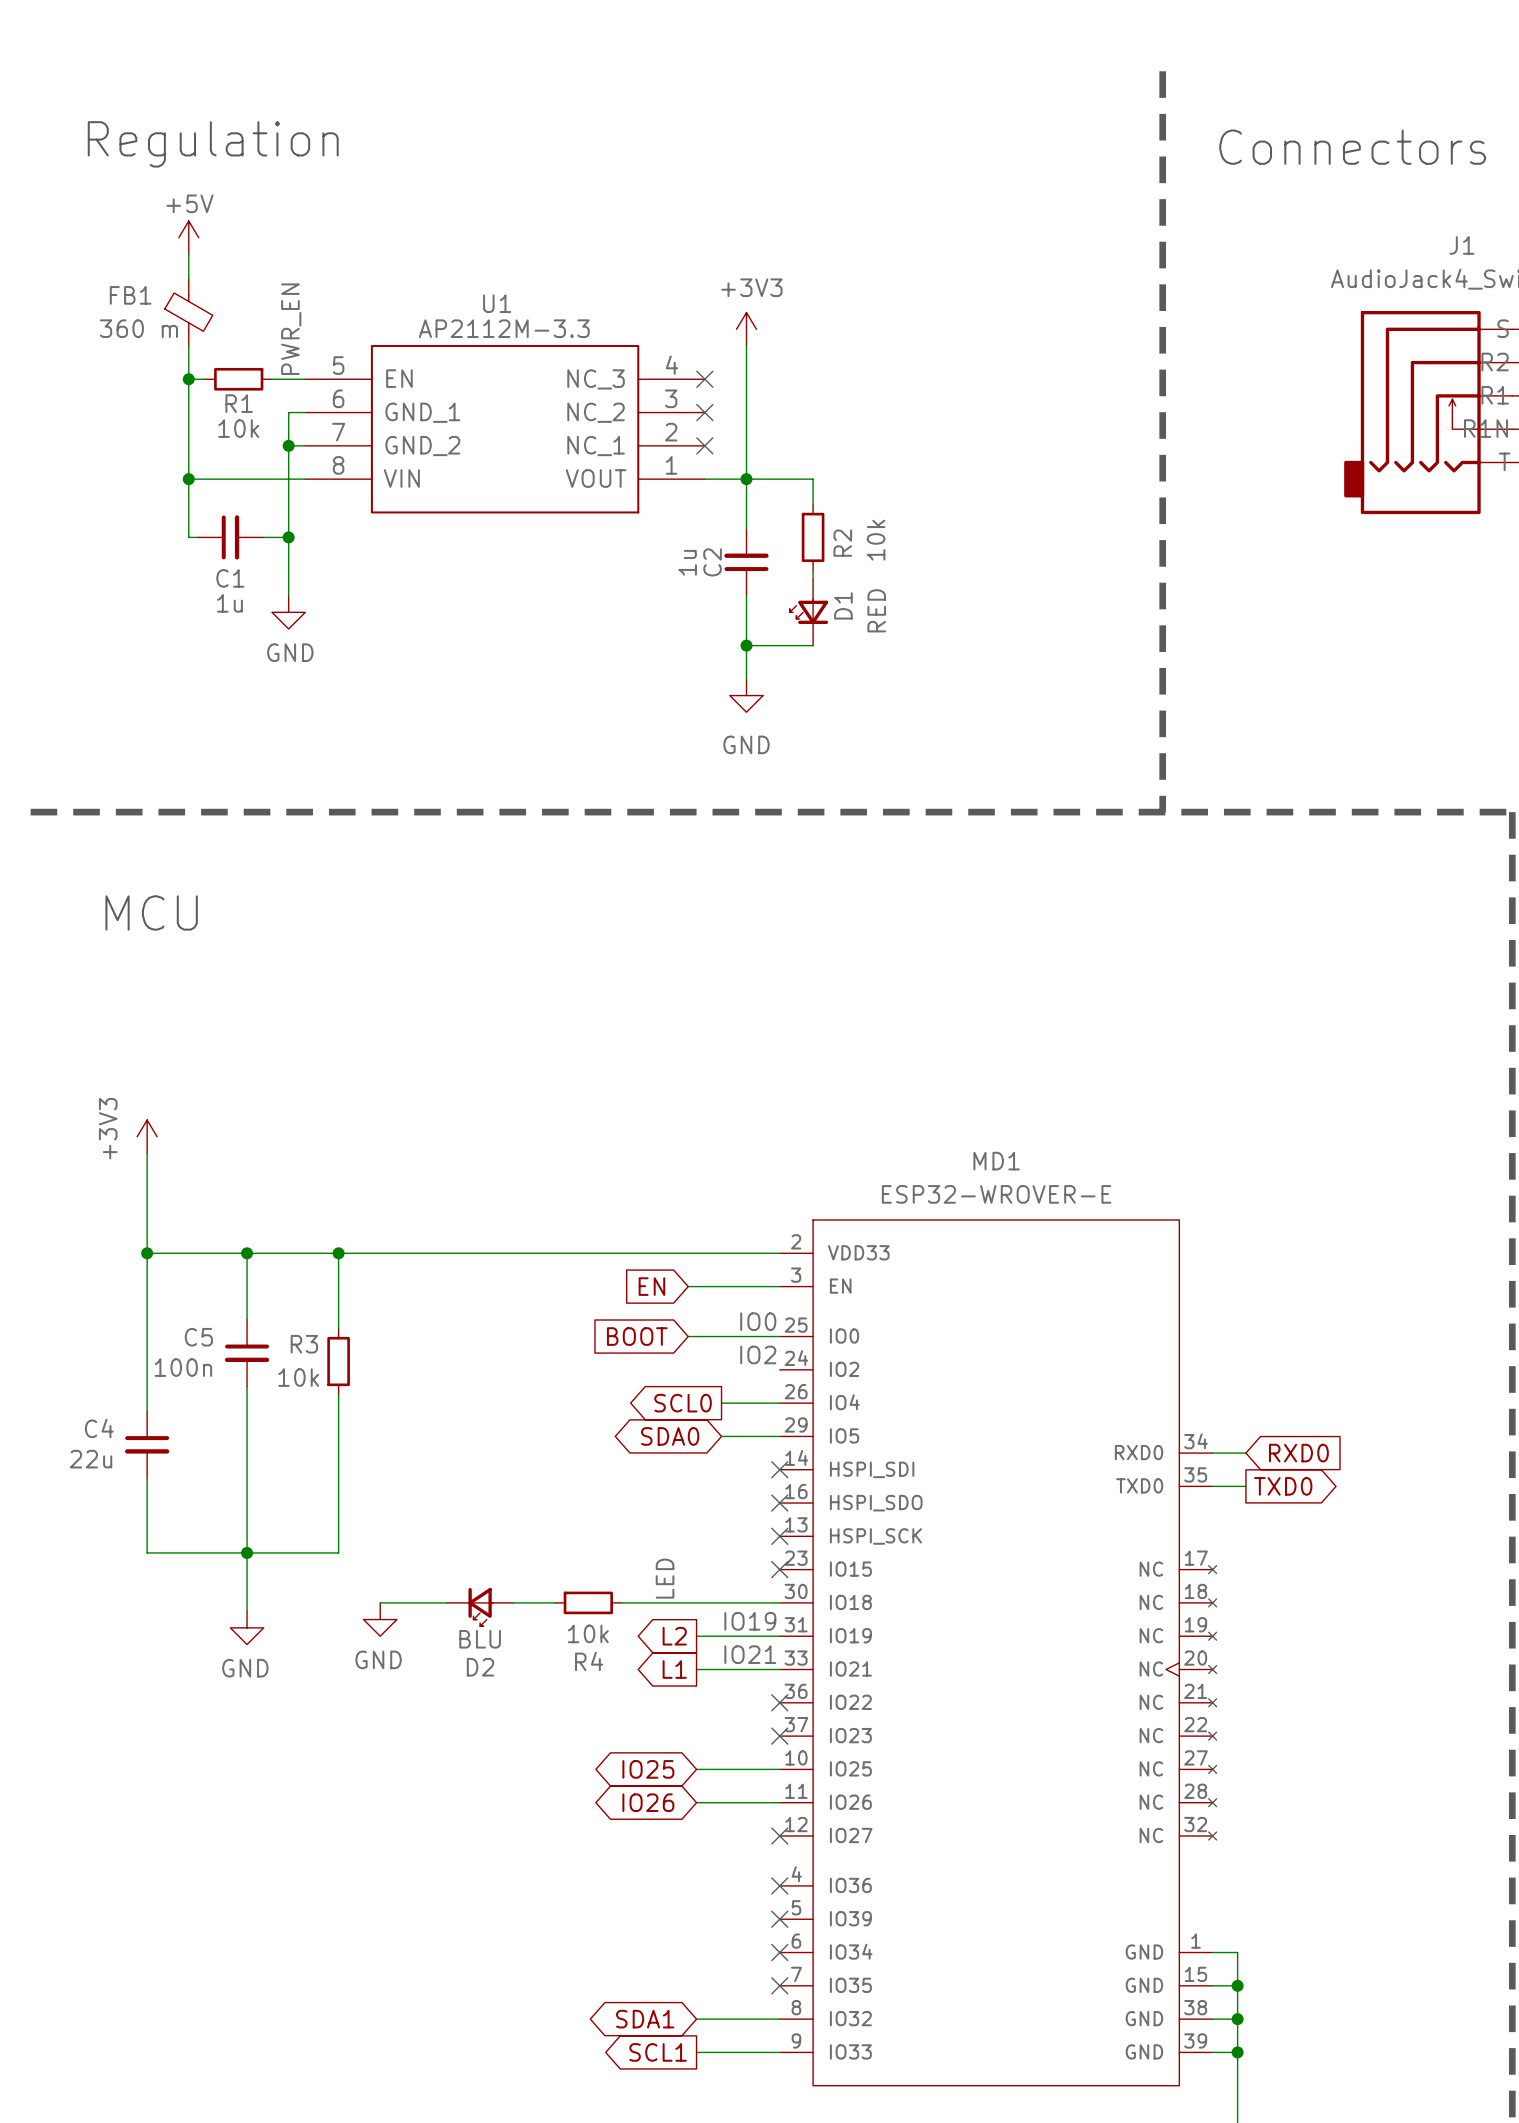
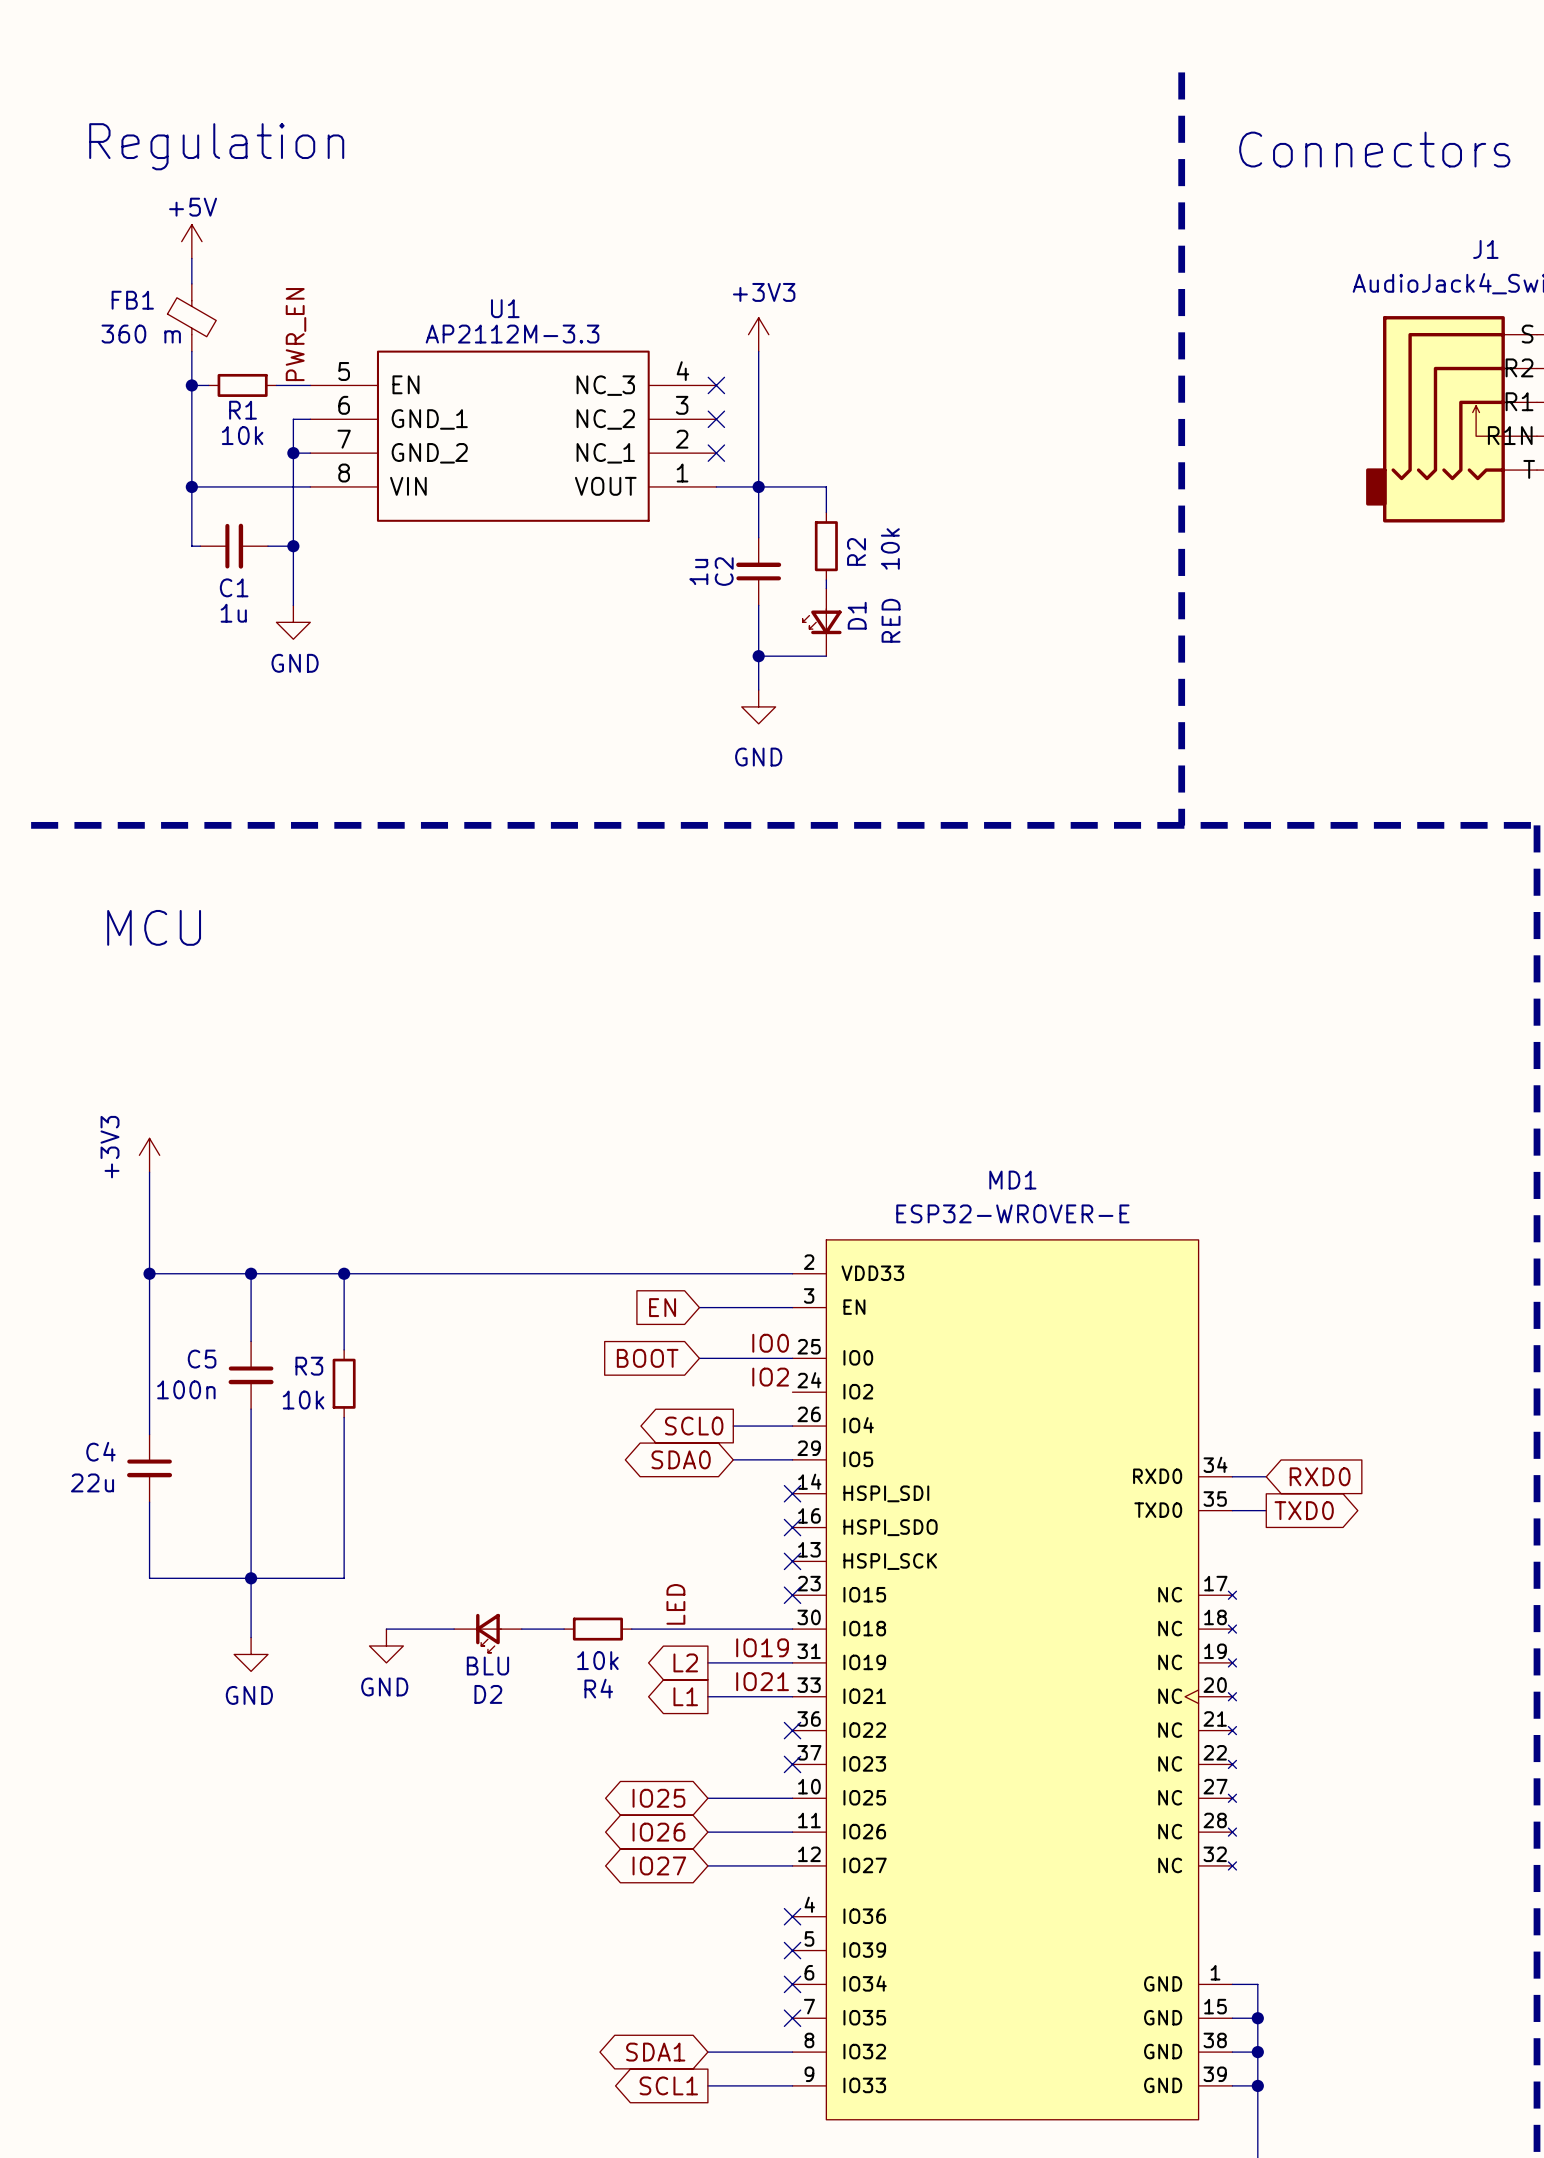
global label: none -> IO27 (659, 1865)
wire: none -> (707, 1865) (792, 1865)
no-connect mark: (779, 1835) -> none

